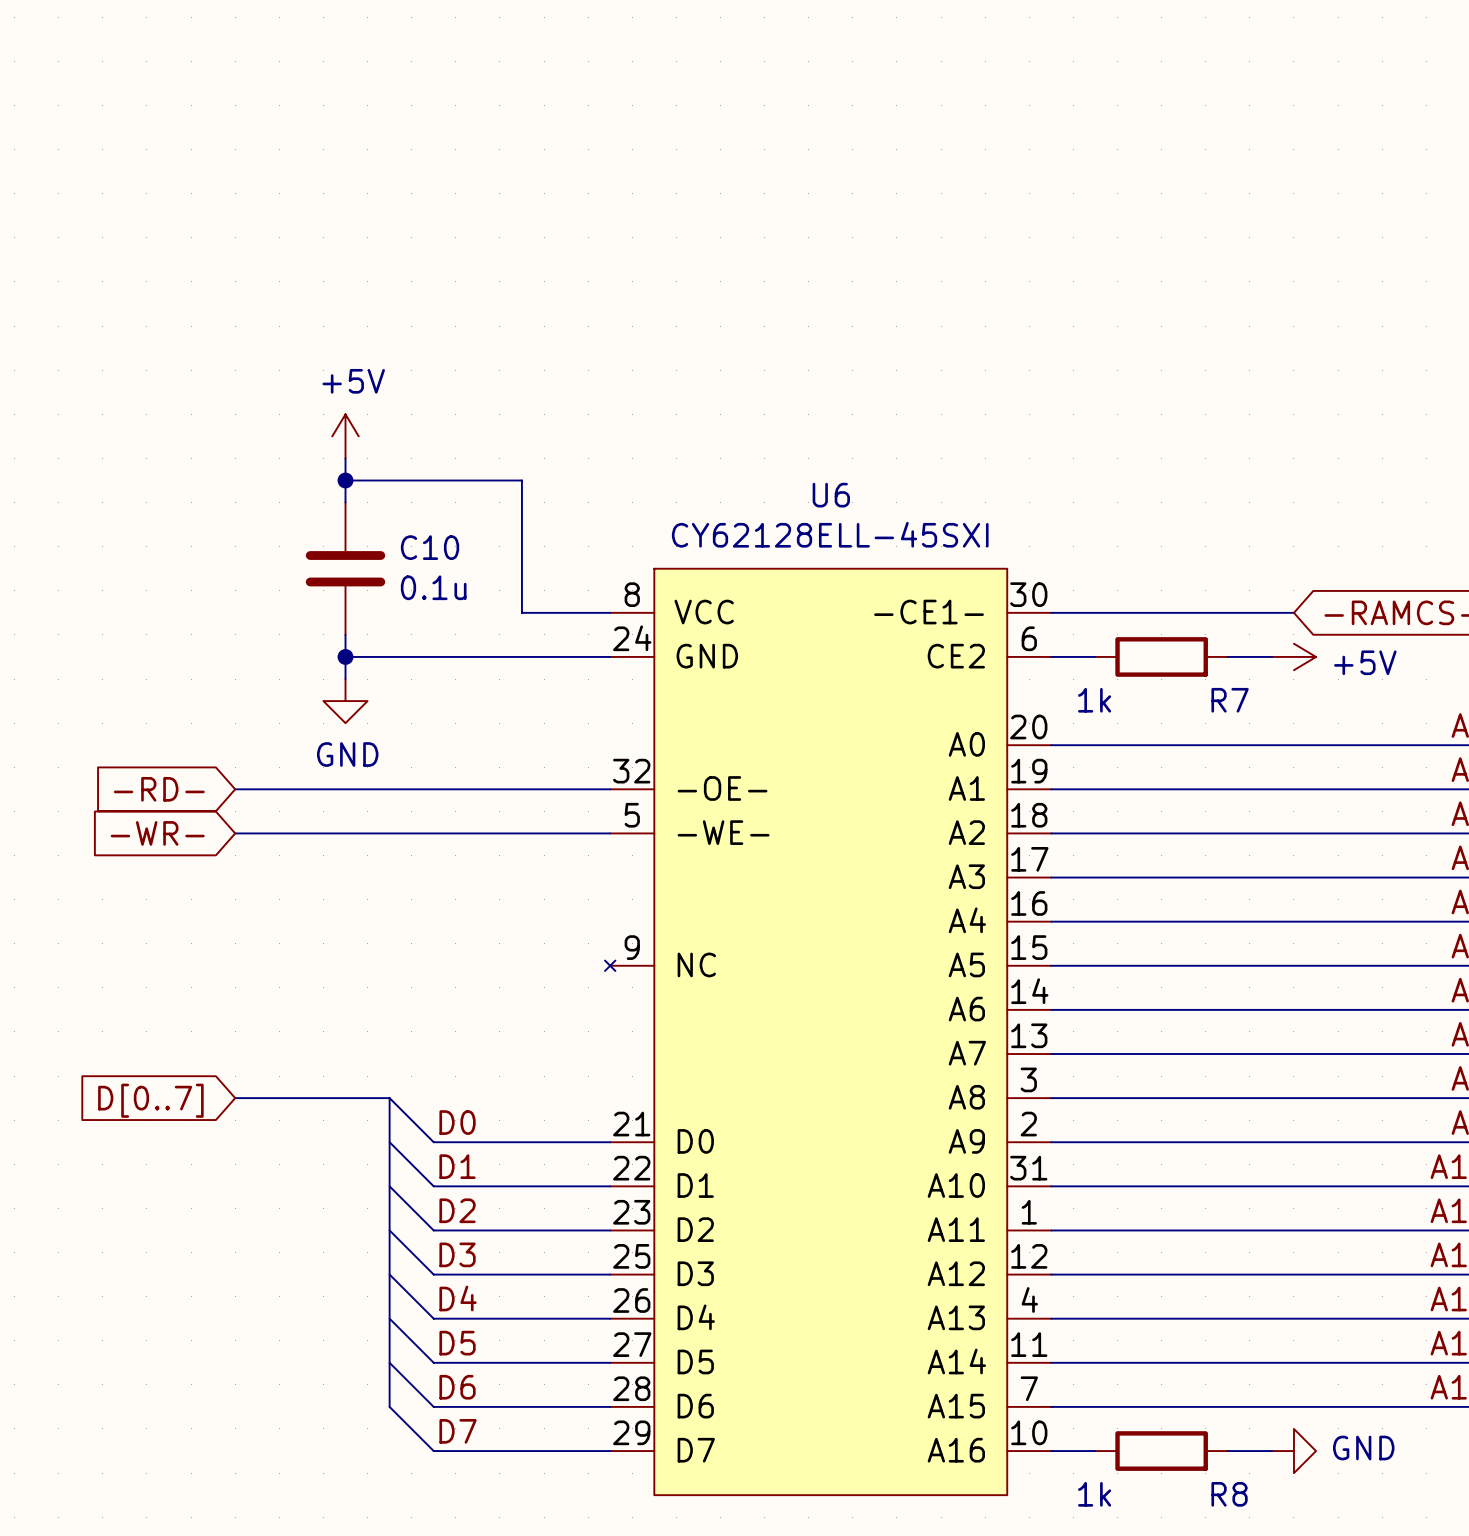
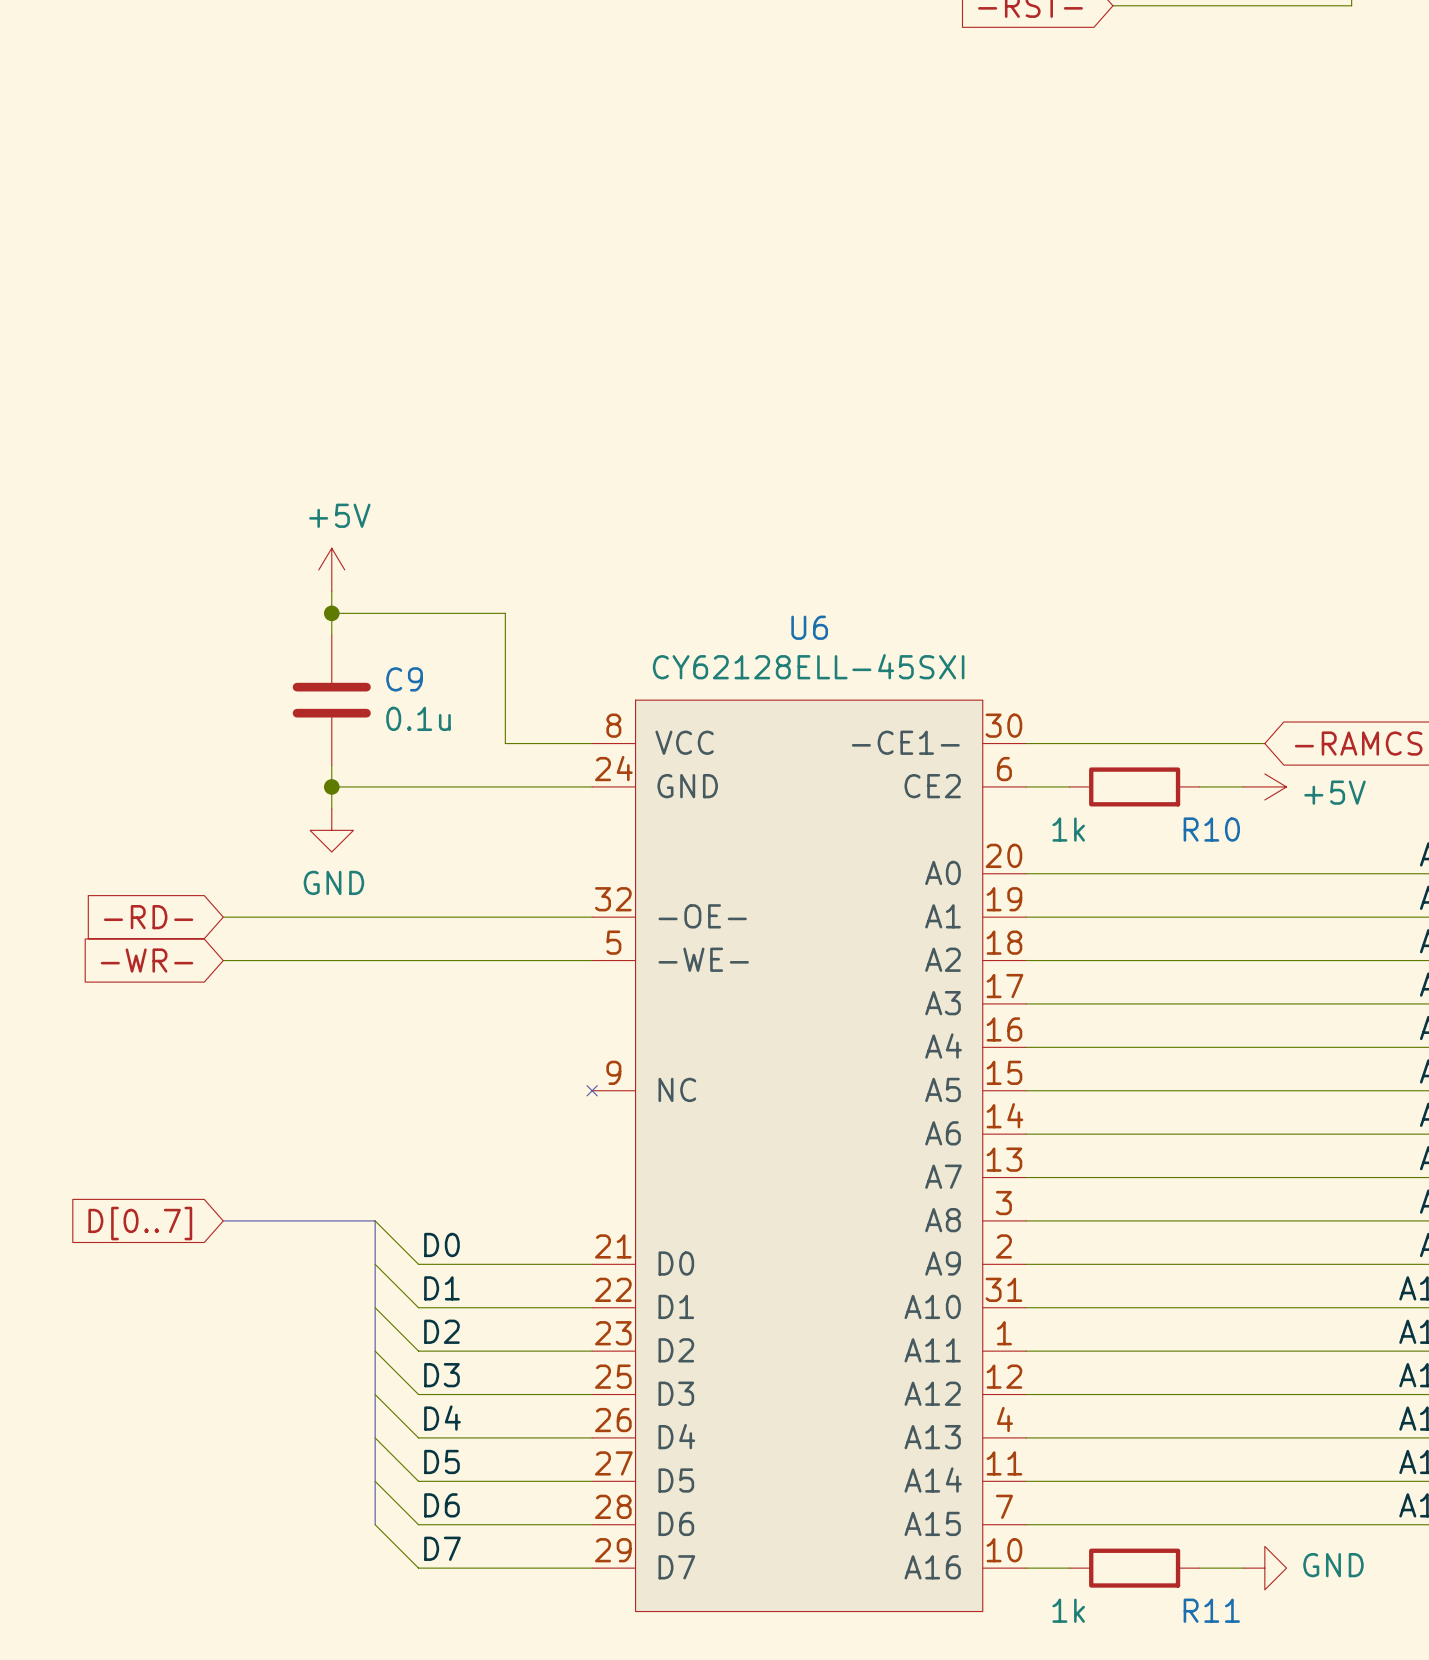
C10 name: C10 (430, 547) -> C9 (404, 679)
R7 name: R7 (1230, 700) -> R10 (1211, 829)
R8 name: R8 (1229, 1494) -> R11 (1211, 1610)

